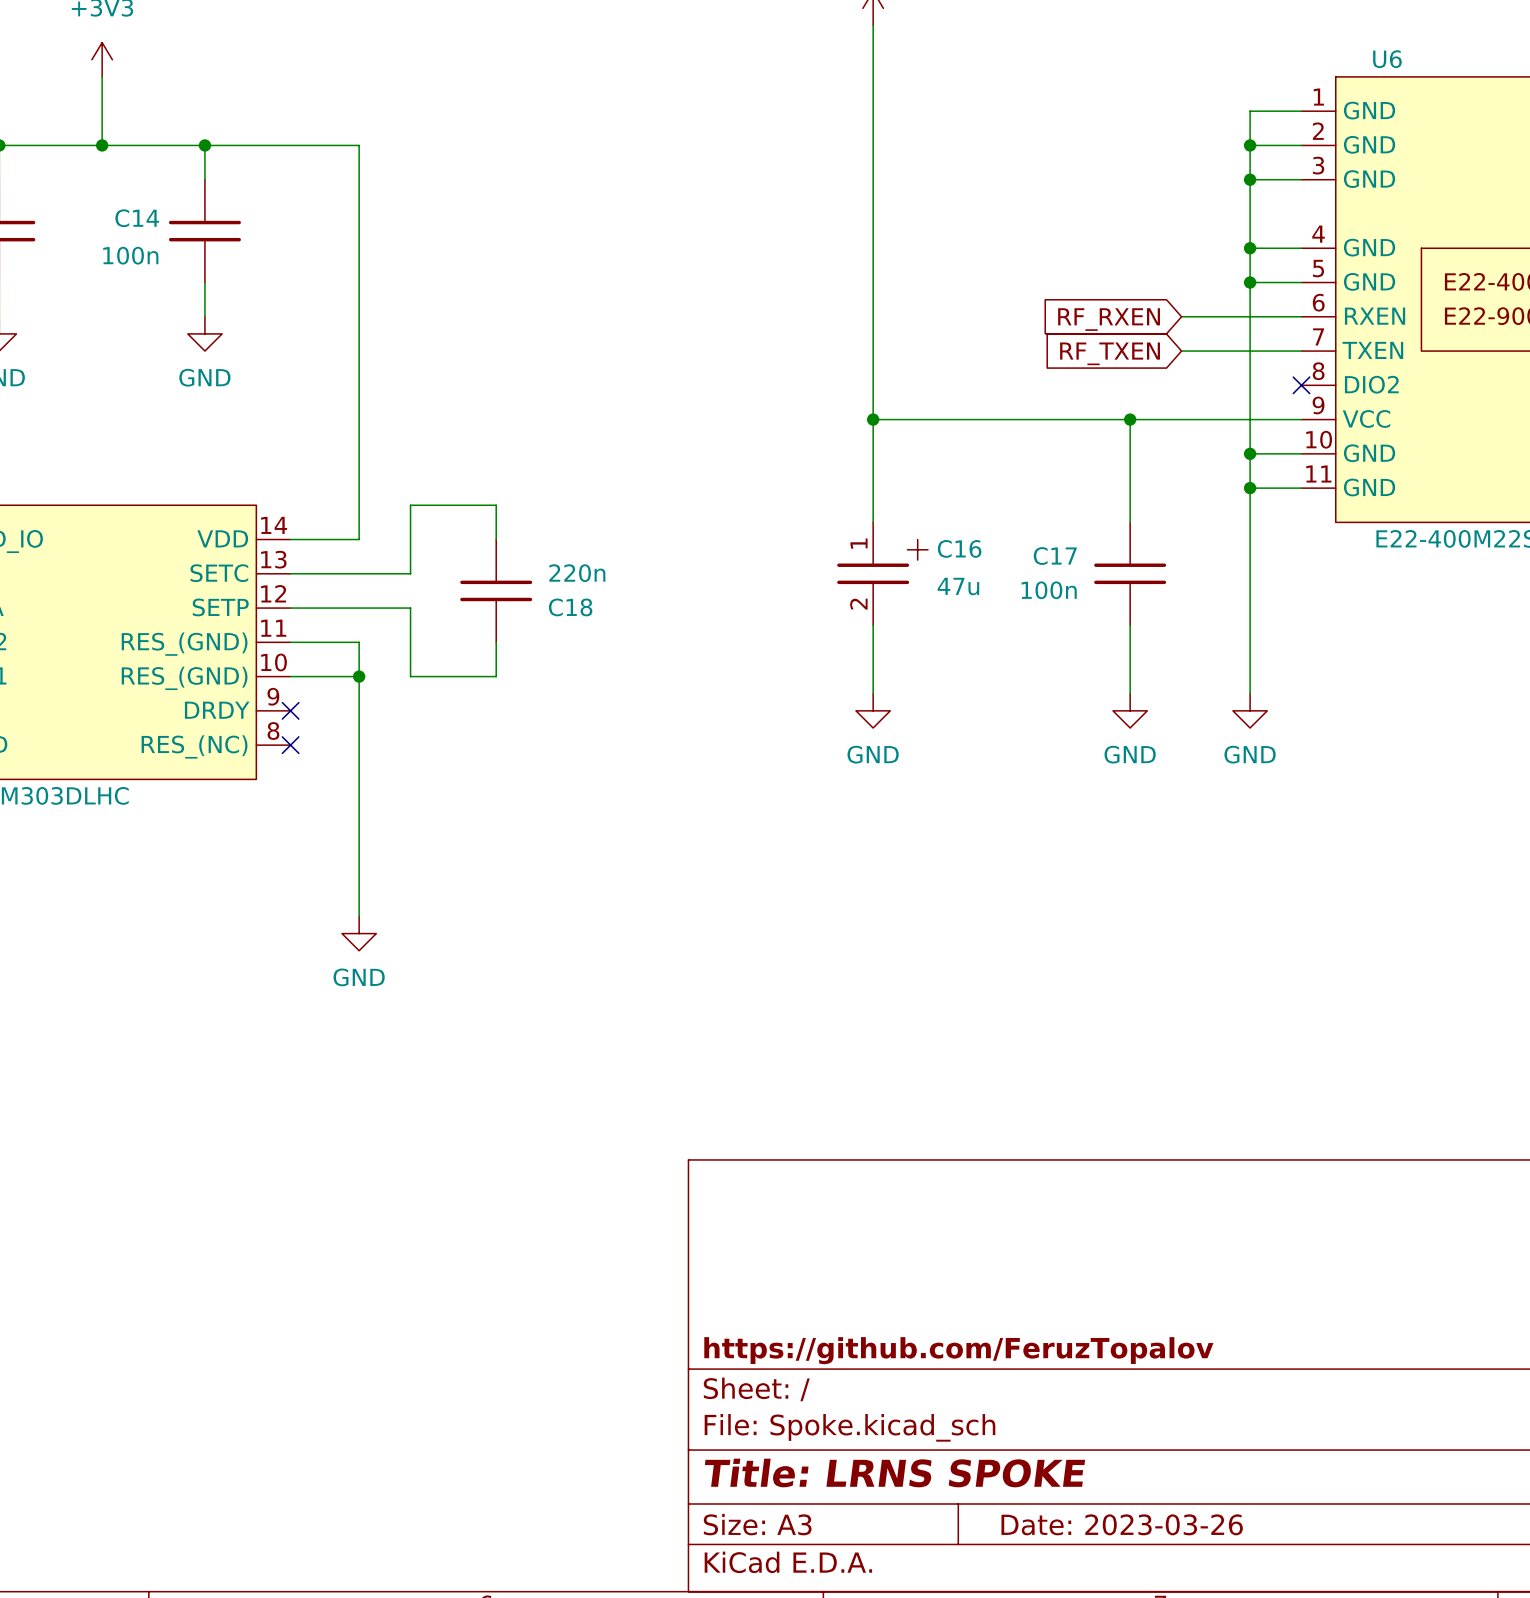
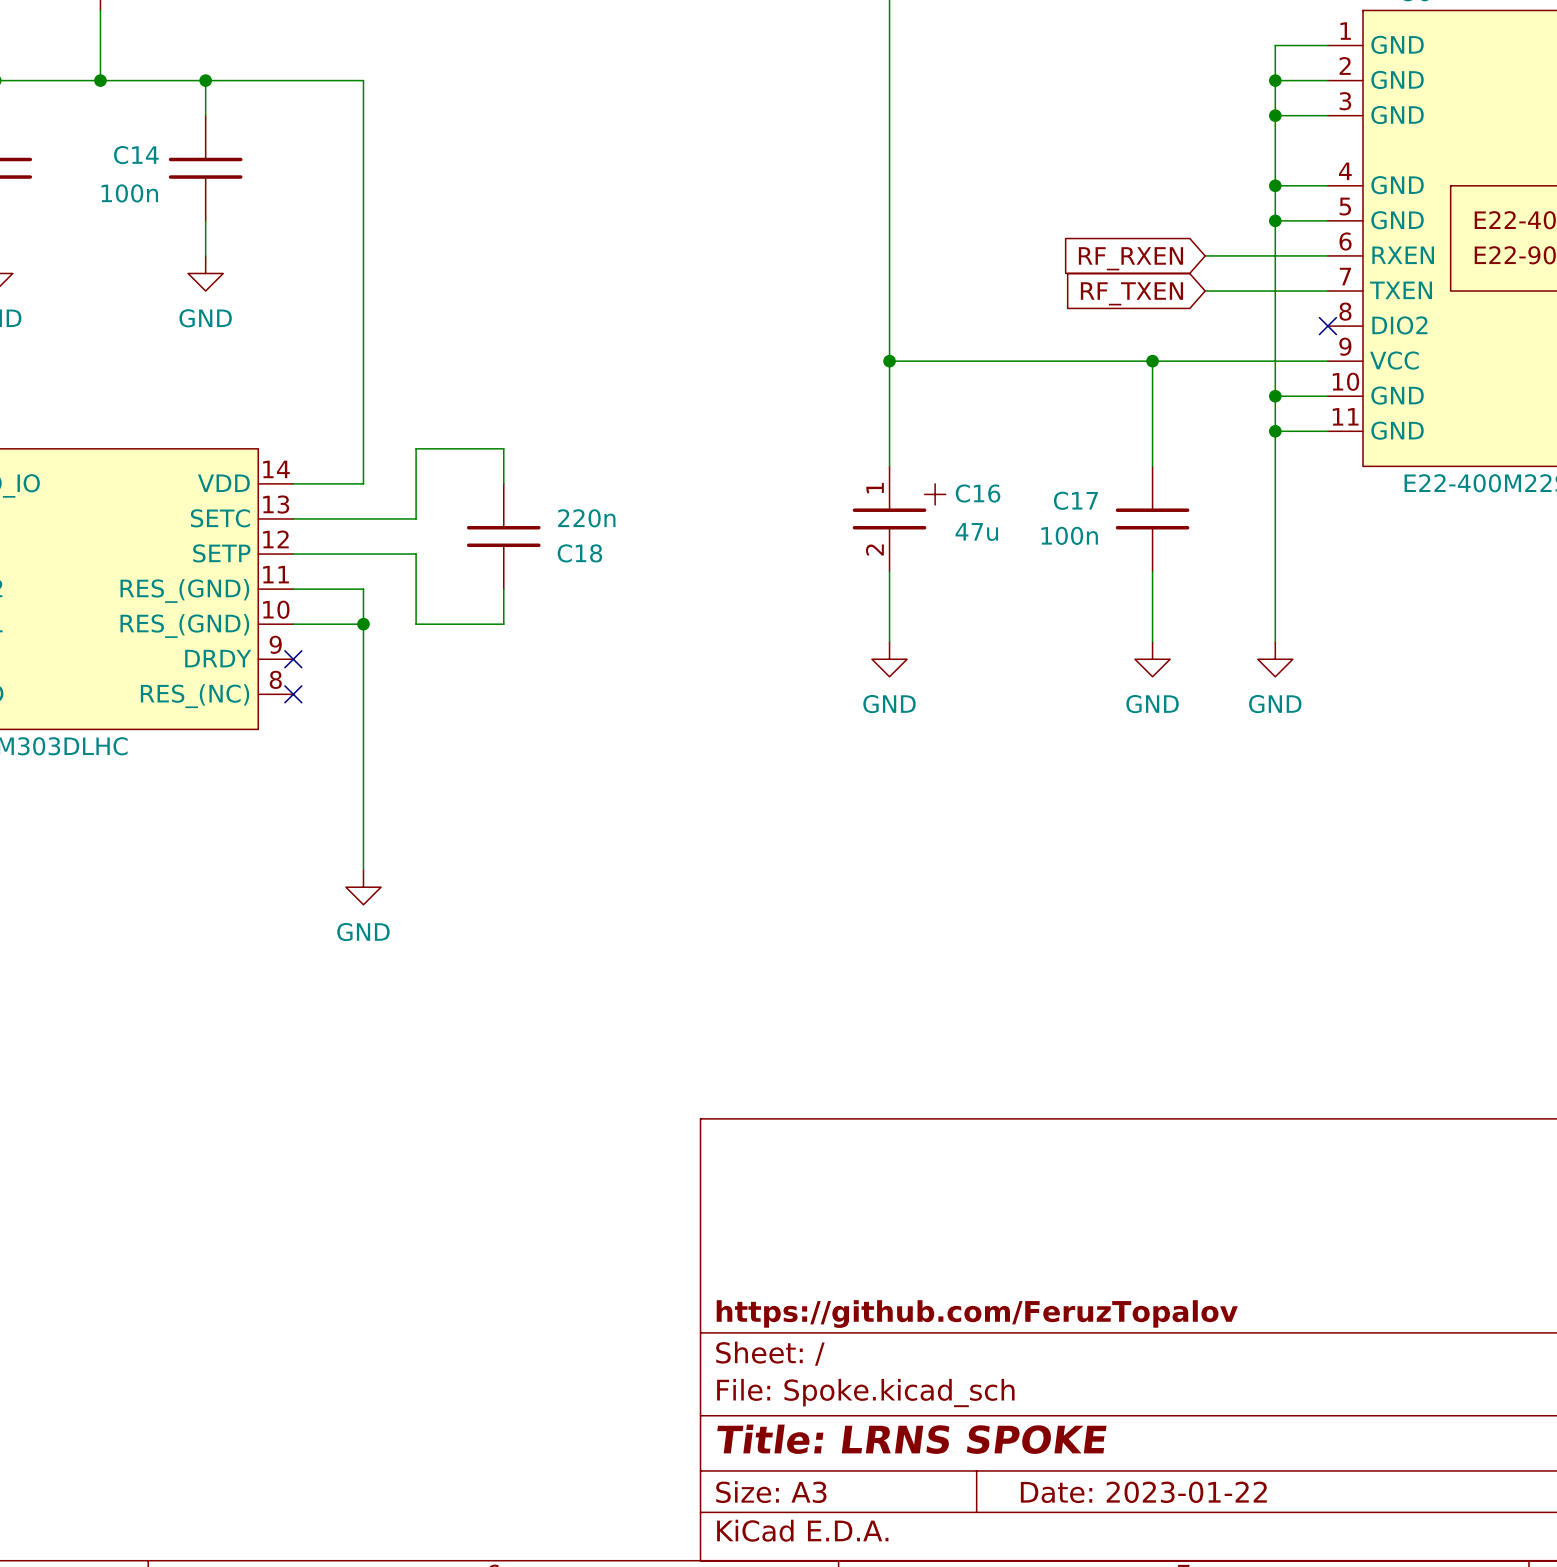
title block: Date: 2023-03-26 (1122, 1524) -> Date: 2023-01-22 (1143, 1492)

